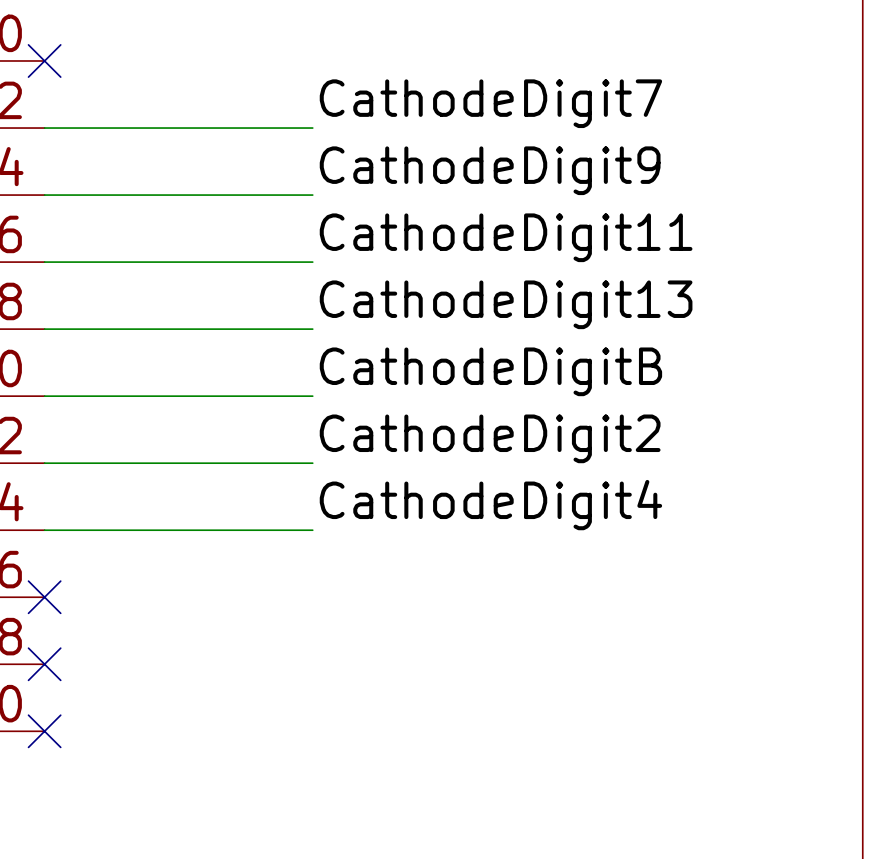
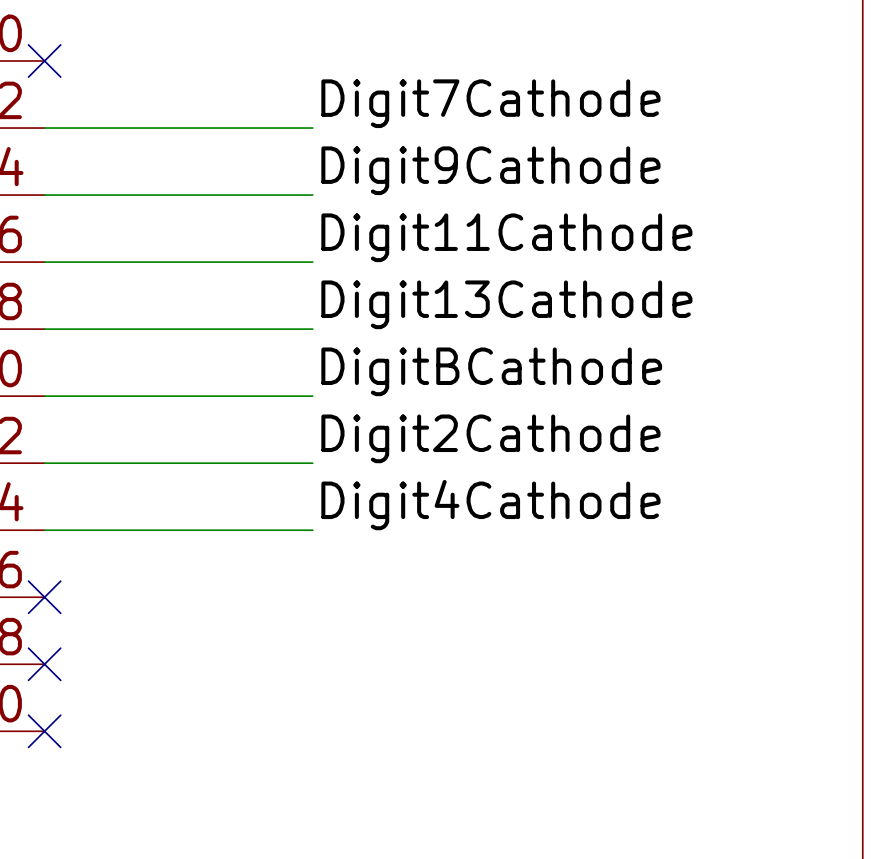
label: CathodeDigit7 (490, 103) -> Digit7Cathode (490, 103)
label: CathodeDigit9 (490, 170) -> Digit9Cathode (490, 170)
label: CathodeDigit11 (506, 237) -> Digit11Cathode (506, 237)
label: CathodeDigit13 (506, 304) -> Digit13Cathode (506, 304)
label: CathodeDigitB (490, 371) -> DigitBCathode (491, 371)
label: CathodeDigit2 (490, 438) -> Digit2Cathode (490, 438)
label: CathodeDigit4 (490, 505) -> Digit4Cathode (490, 505)

